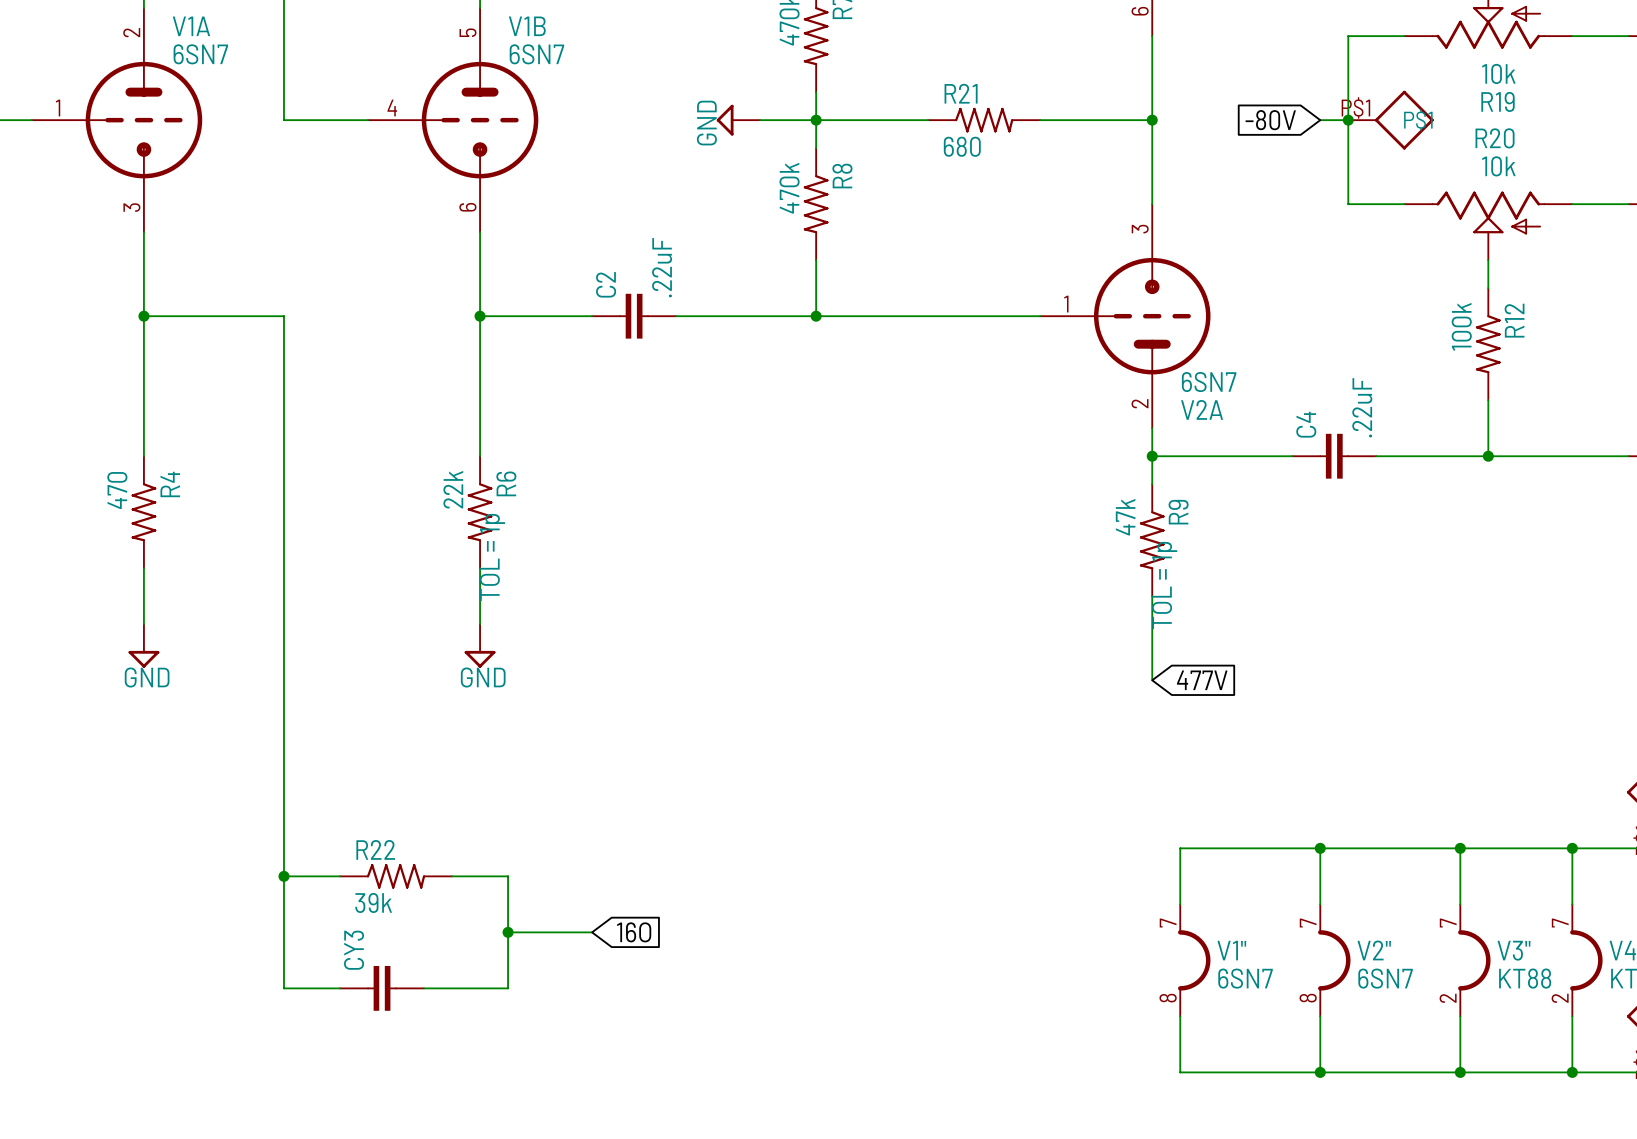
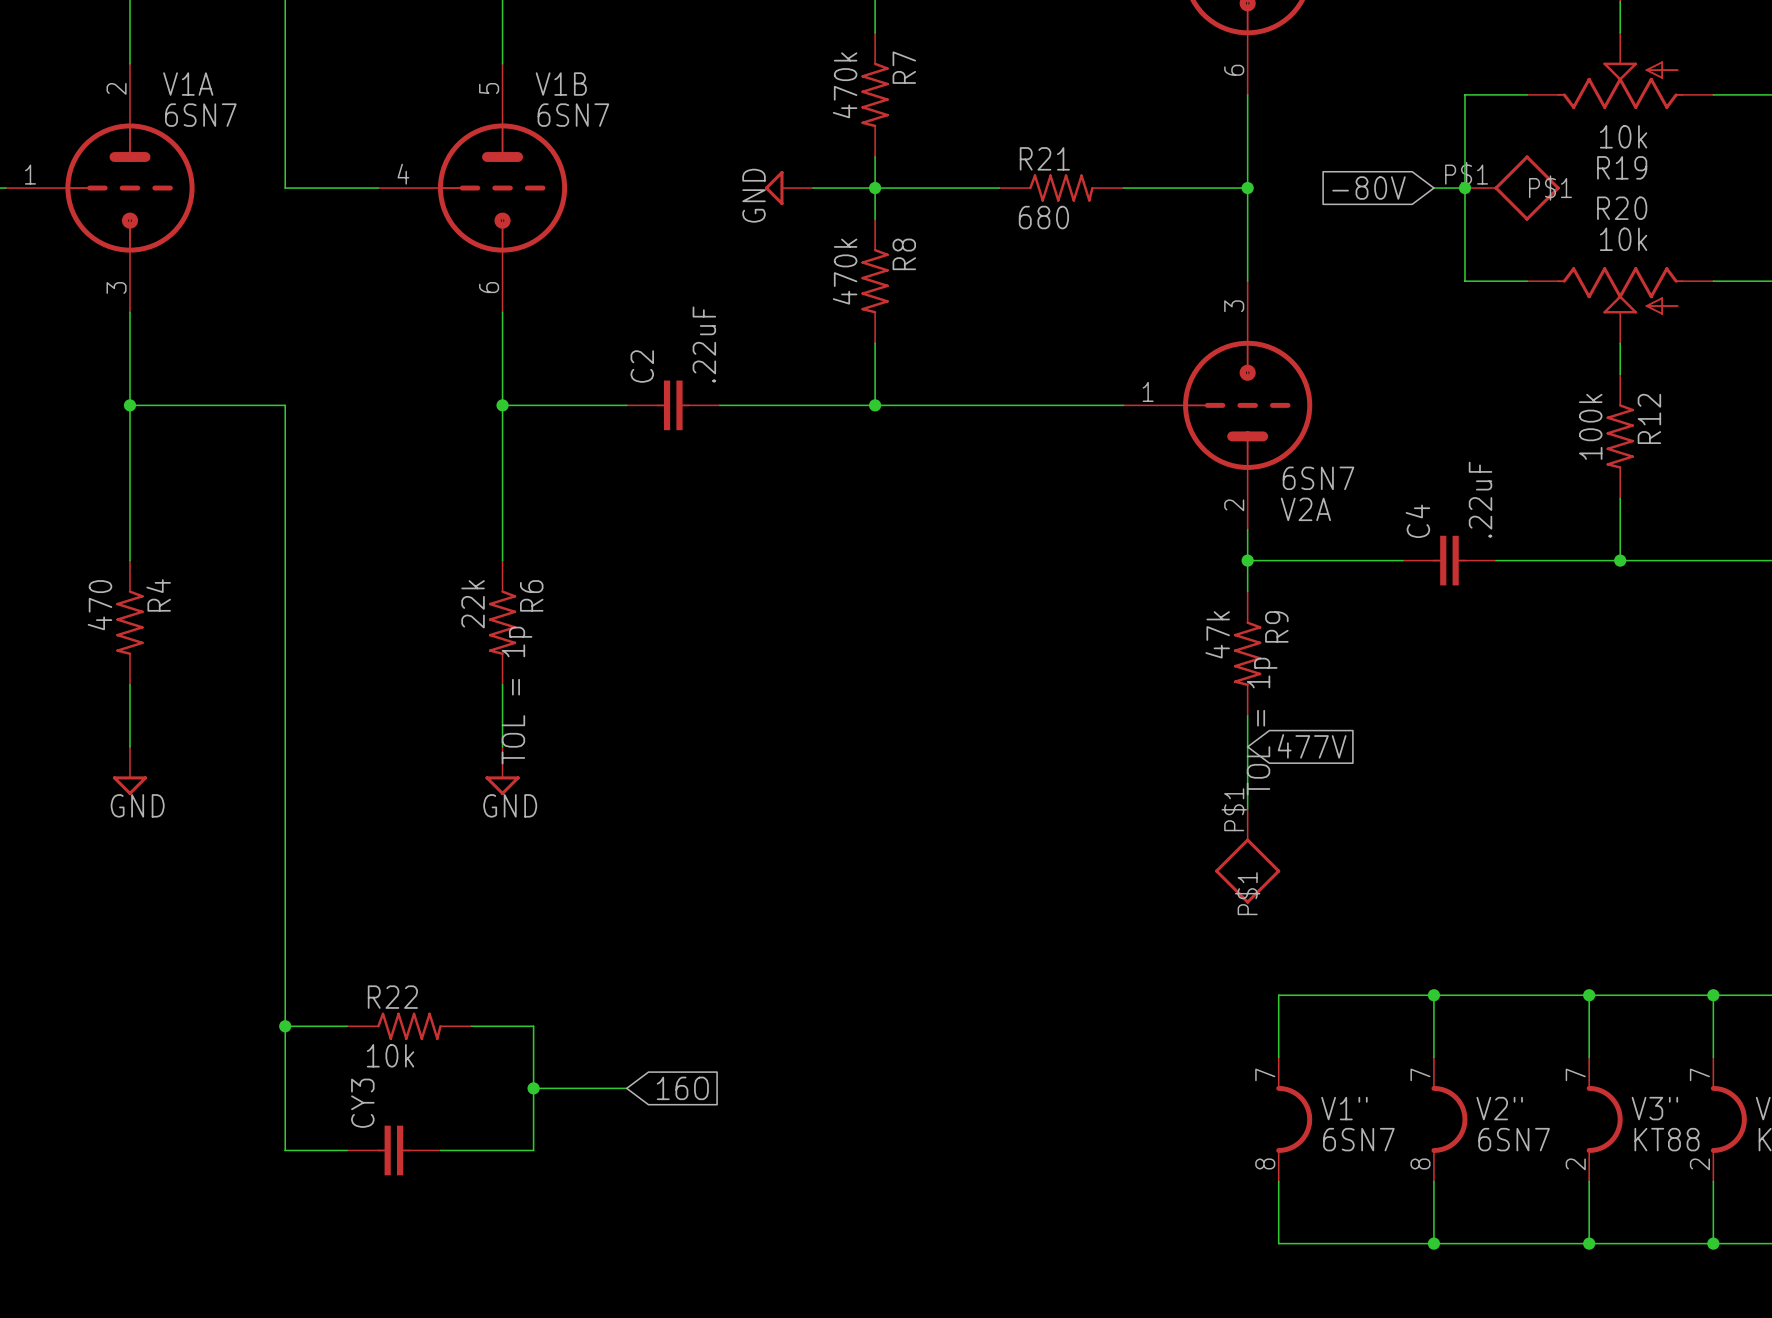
global label position: 477V (1202, 680) -> 477V (1312, 746)
part: none -> (1247, 856)
R22 value: 39k (373, 902) -> 10k (390, 1055)

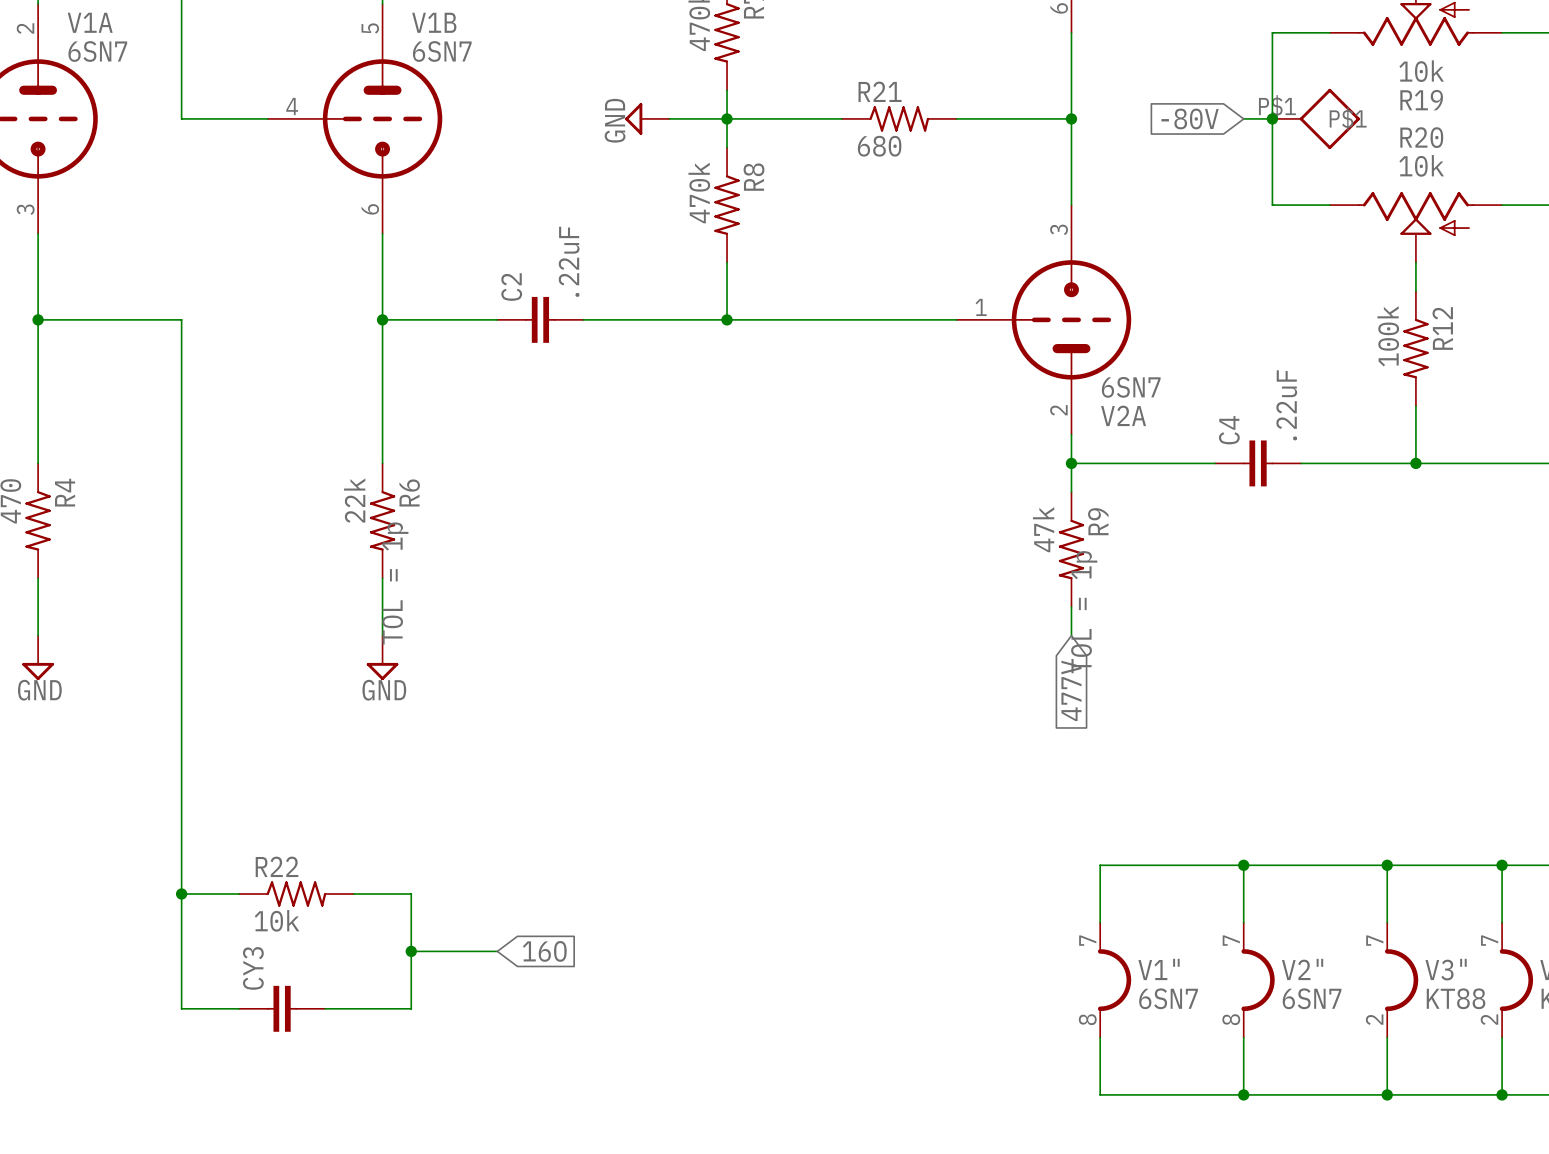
wire: (1247, 746) (1247, 808) -> none
global label rotation: 0° (1312, 746) -> 90° clockwise (1071, 690)
part: (1247, 856) -> none

